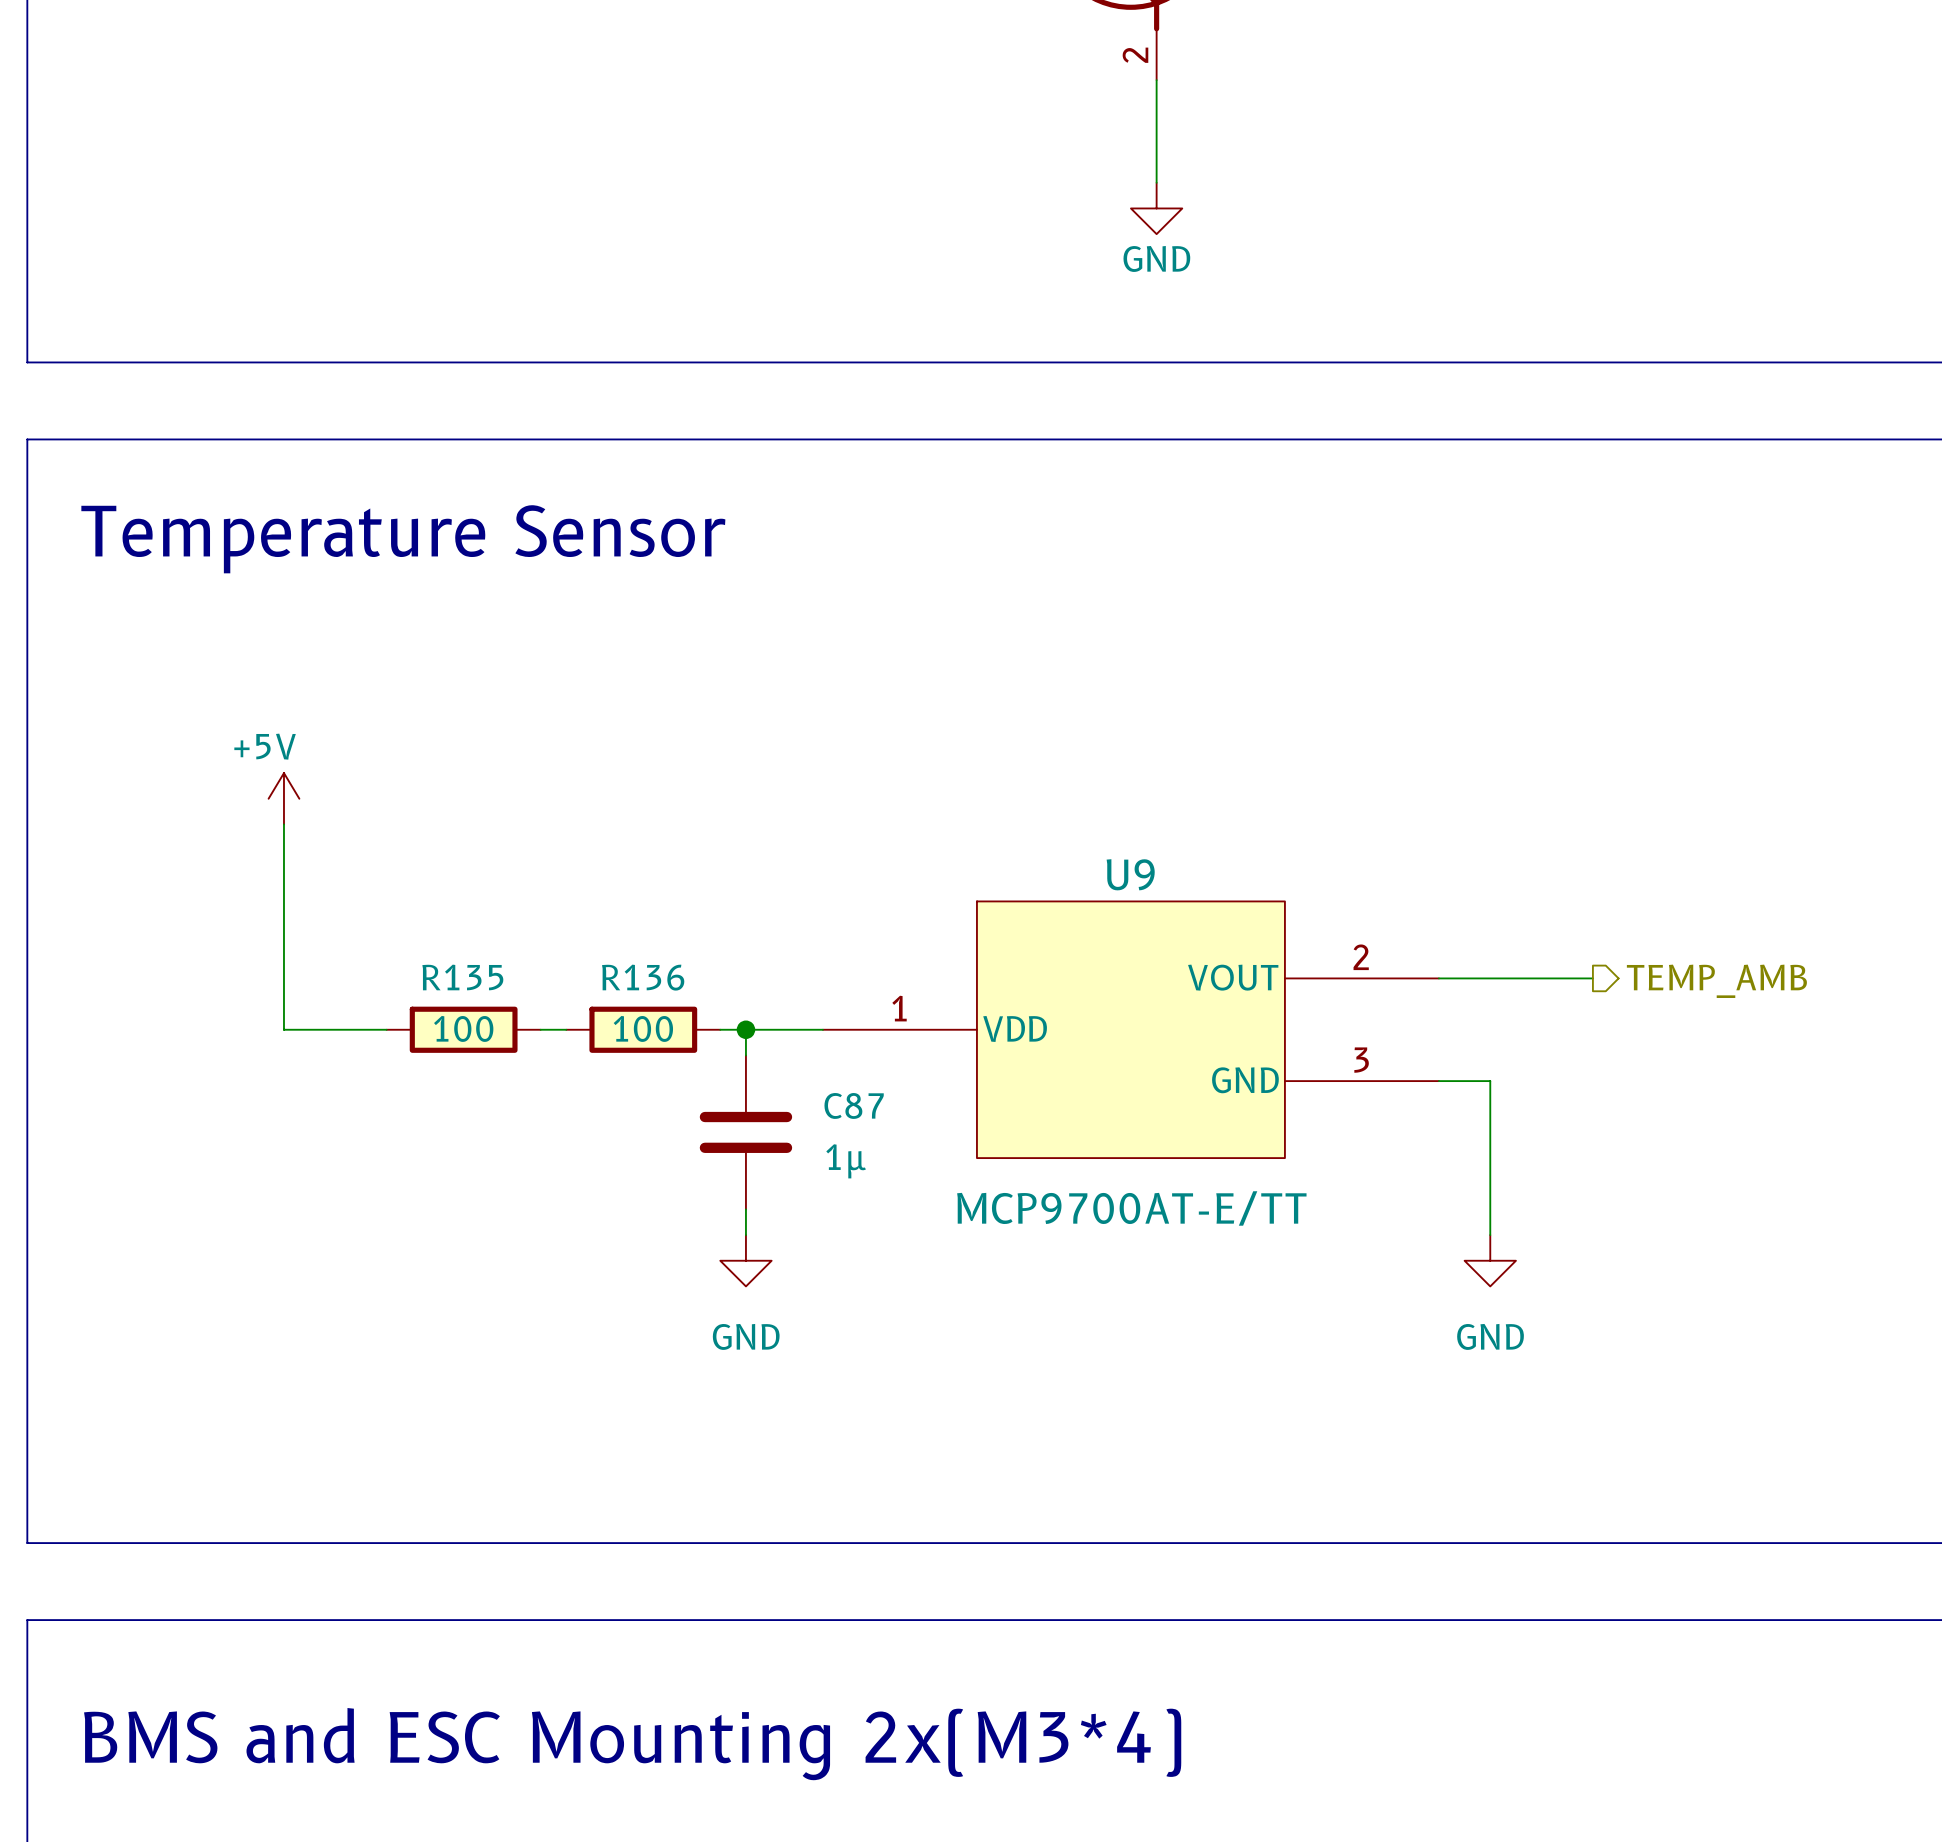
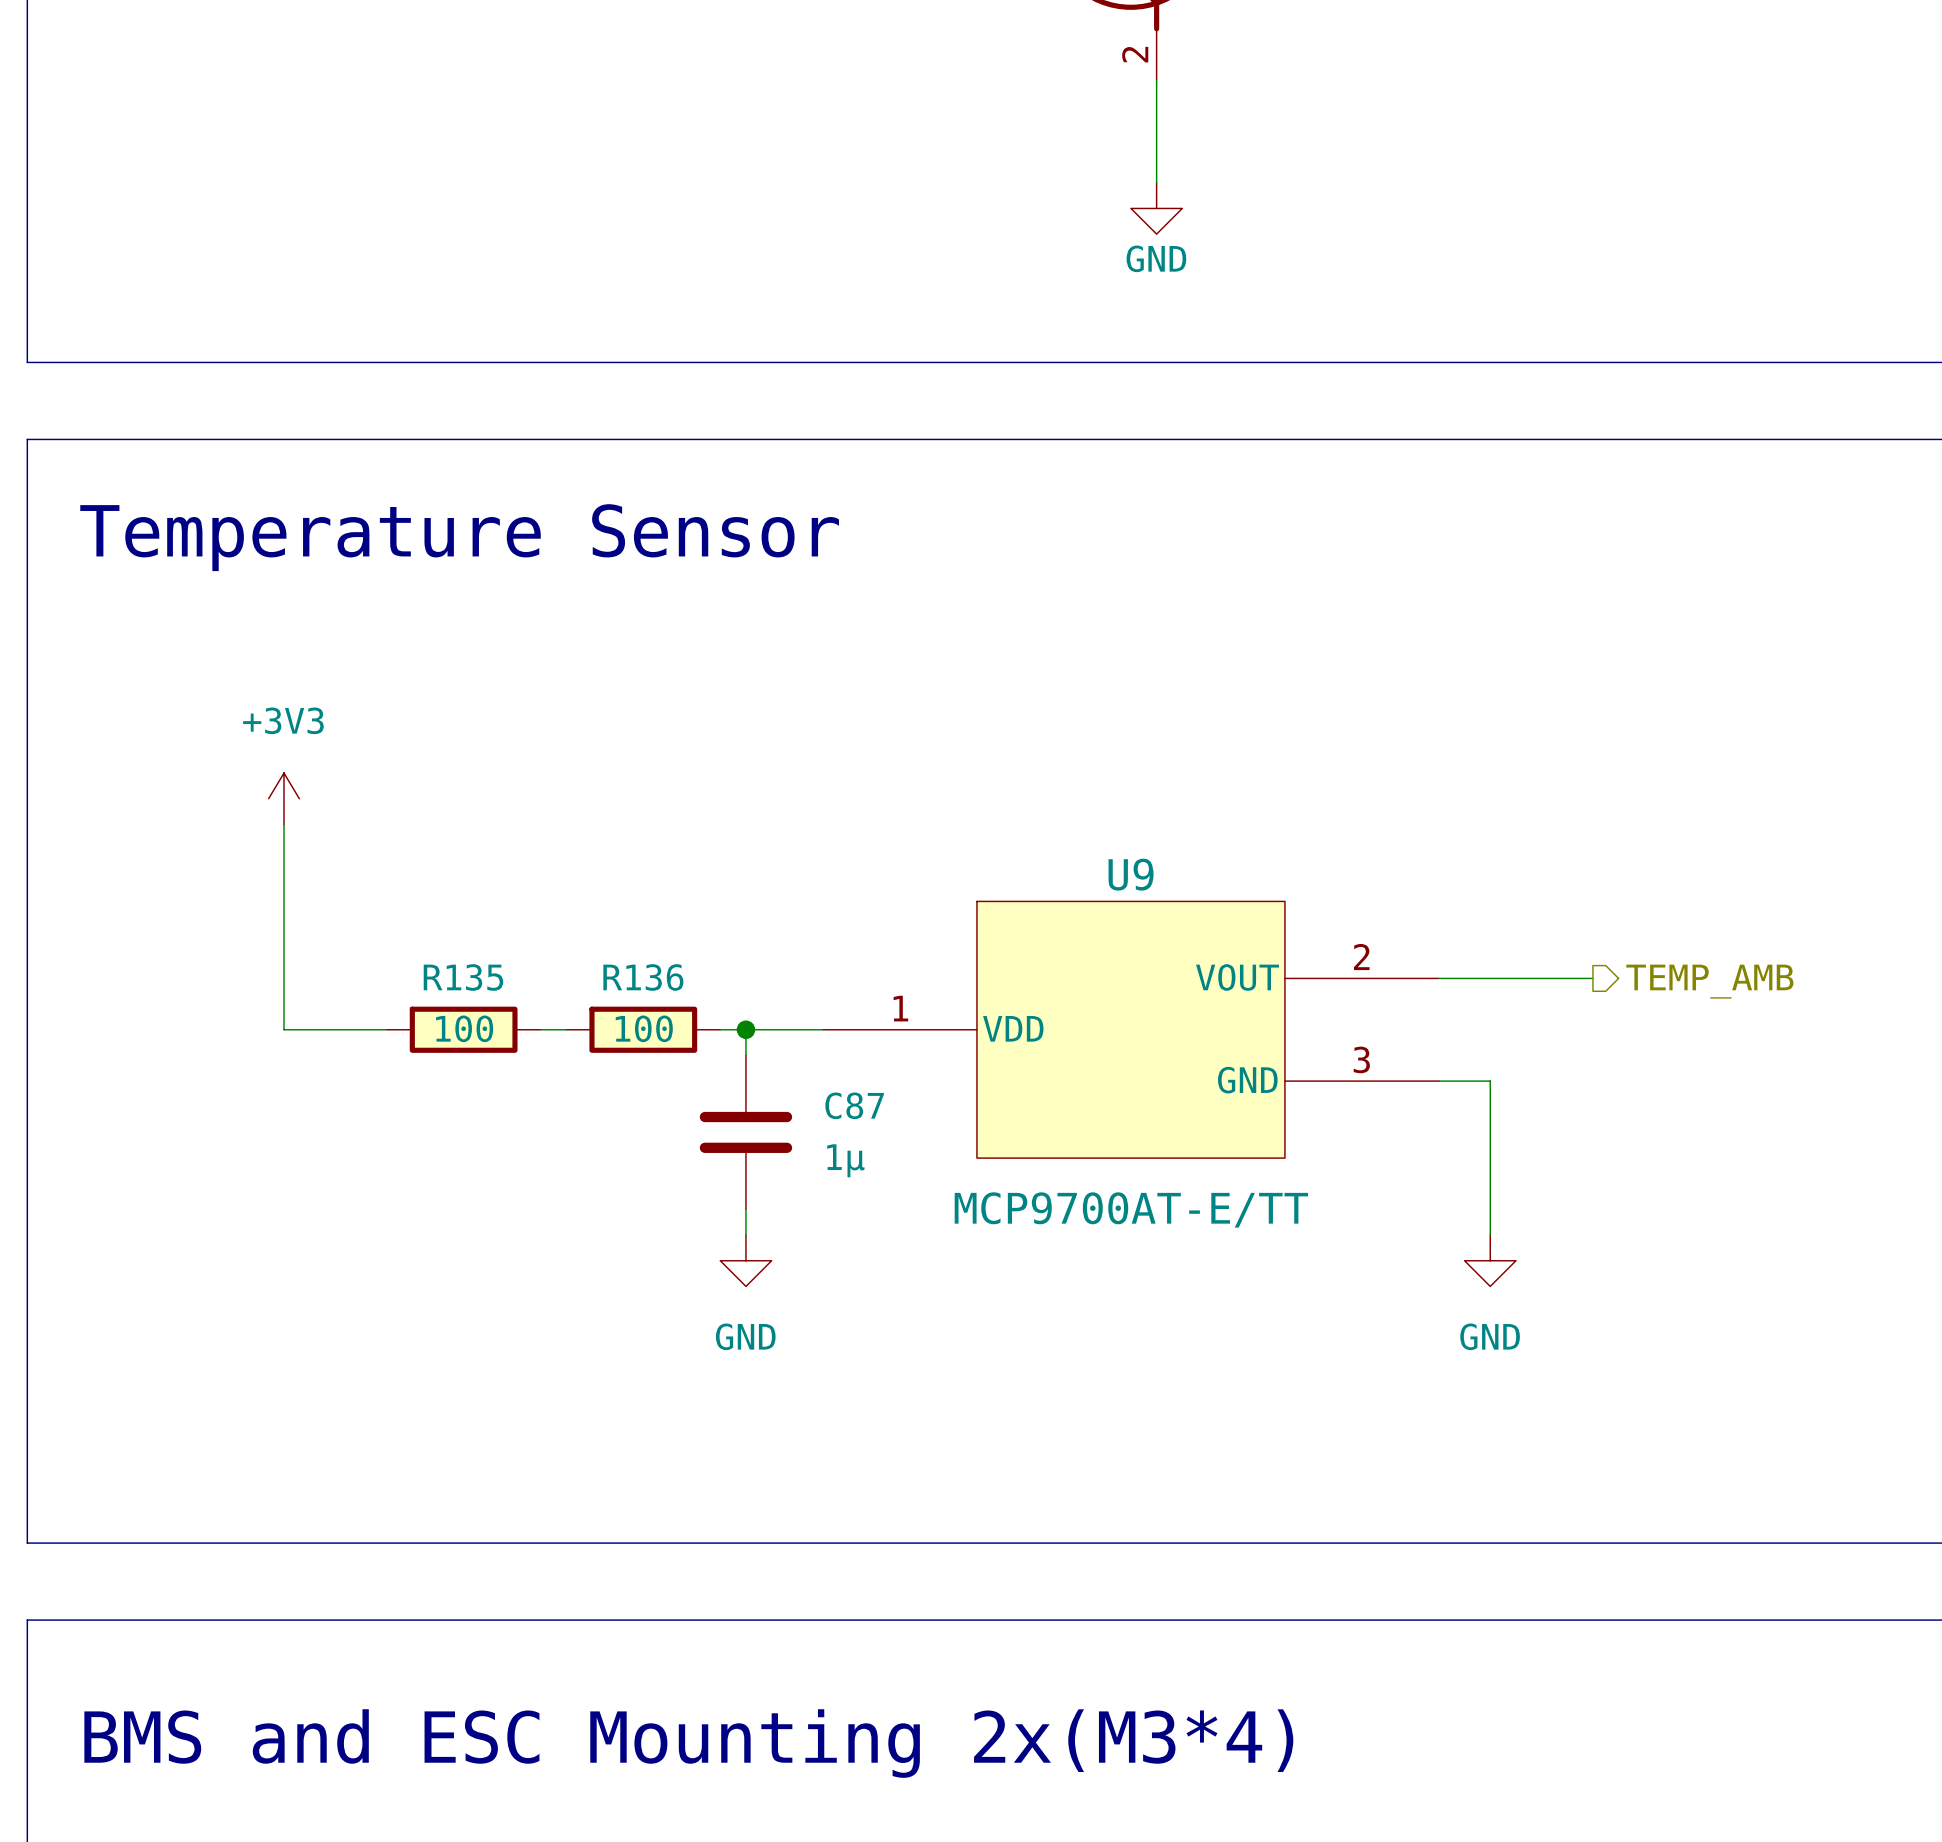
power symbol: +5V (283, 798) -> +3V3 (283, 798)

